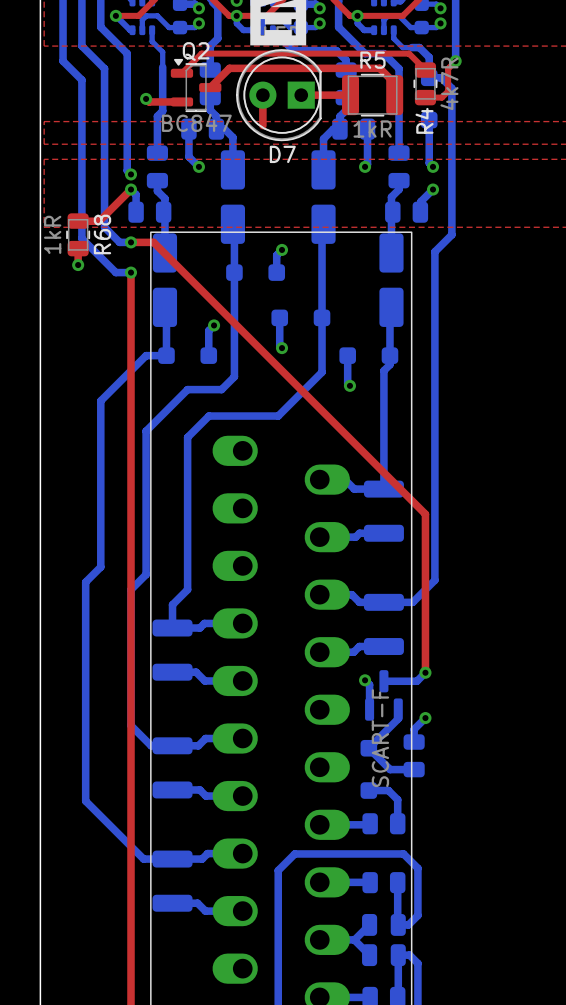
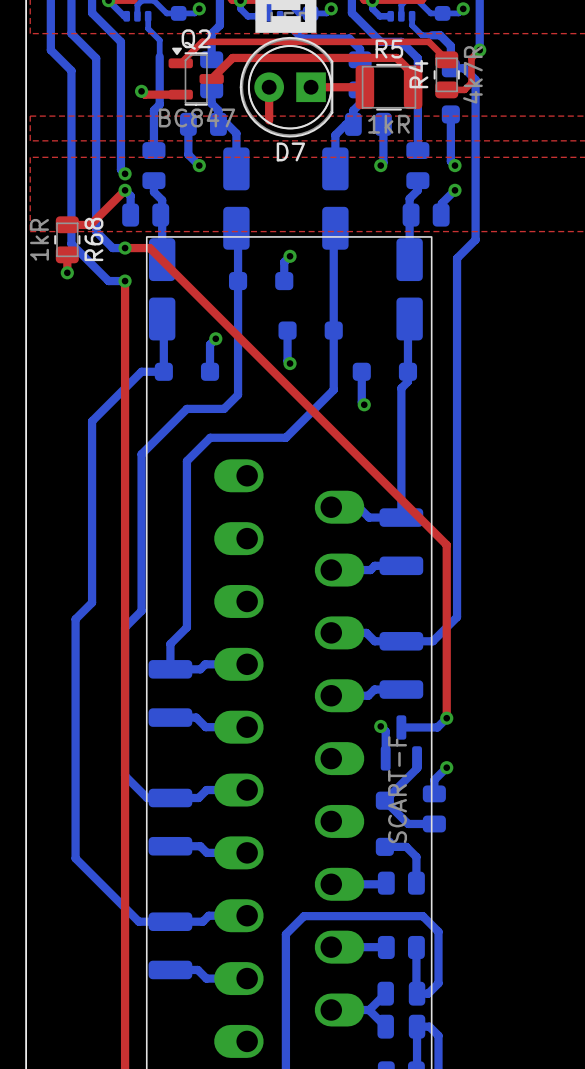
R4 name position: R4 (424, 120) -> R4 (418, 74)

